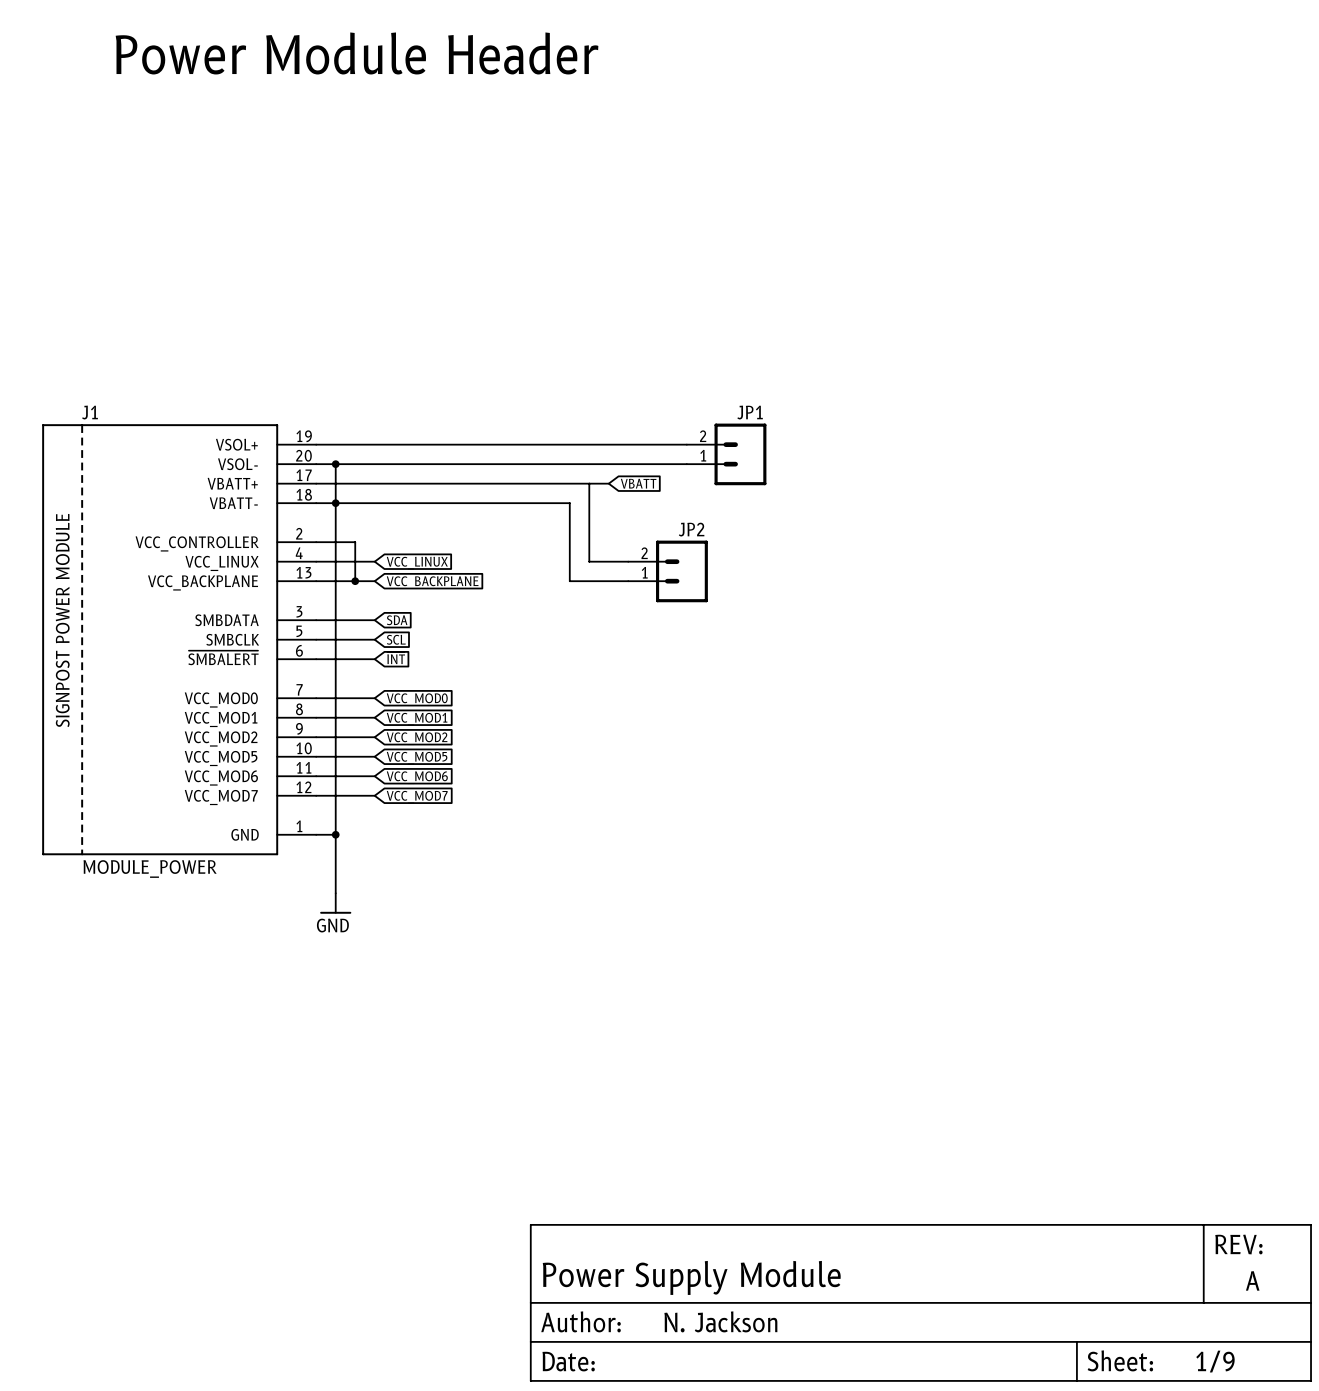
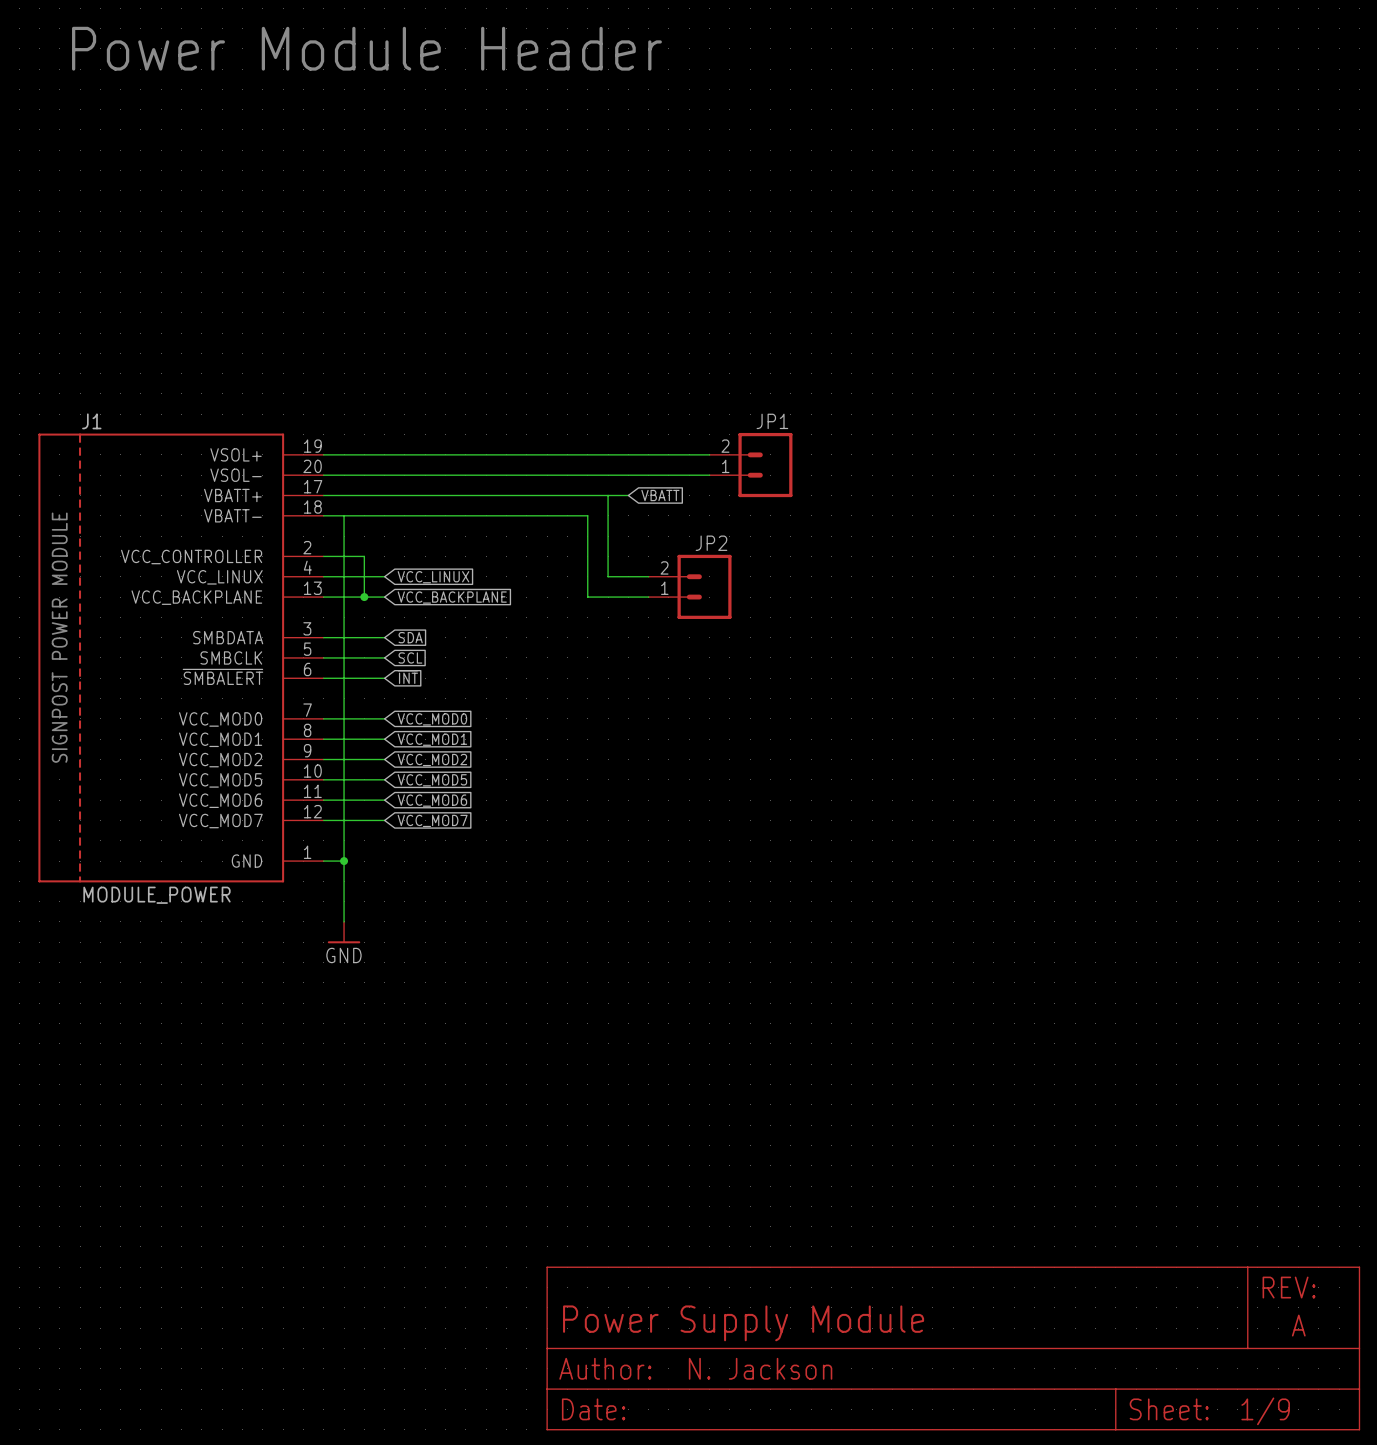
wire: (335, 464) (335, 503) -> none
junction: (335, 464) -> none
junction: (335, 503) -> none

